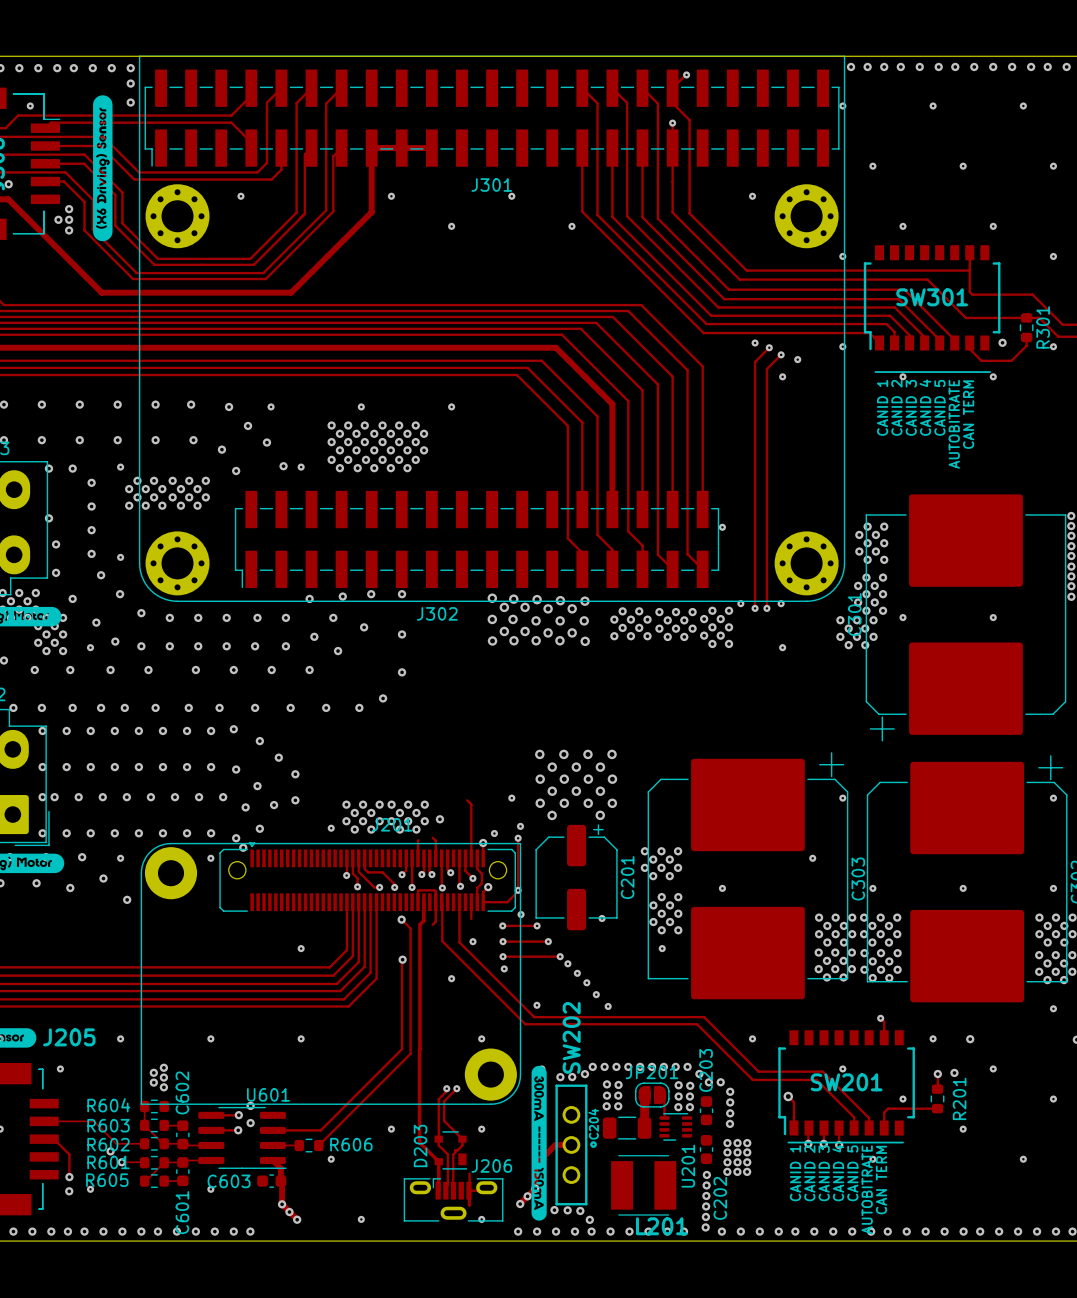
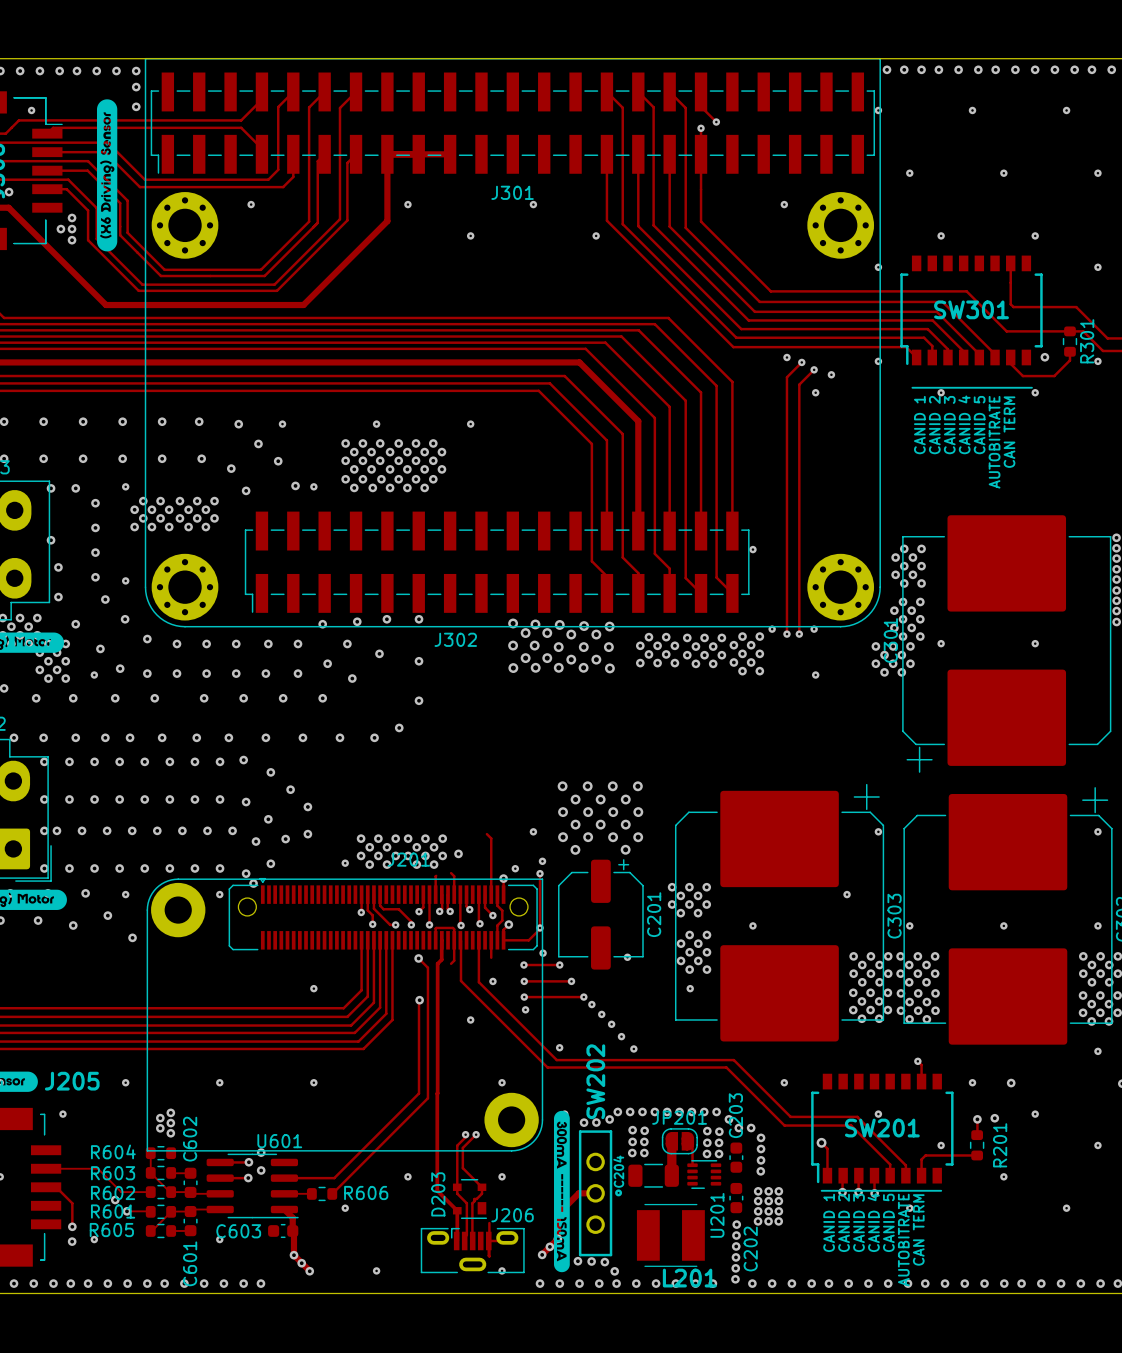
track: (686, 74) (672, 88) -> none
via position: (686, 74) -> (716, 122)
track: (672, 102) (689, 120) (689, 213) (746, 270) (969, 270) -> (701, 106) (716, 122)

